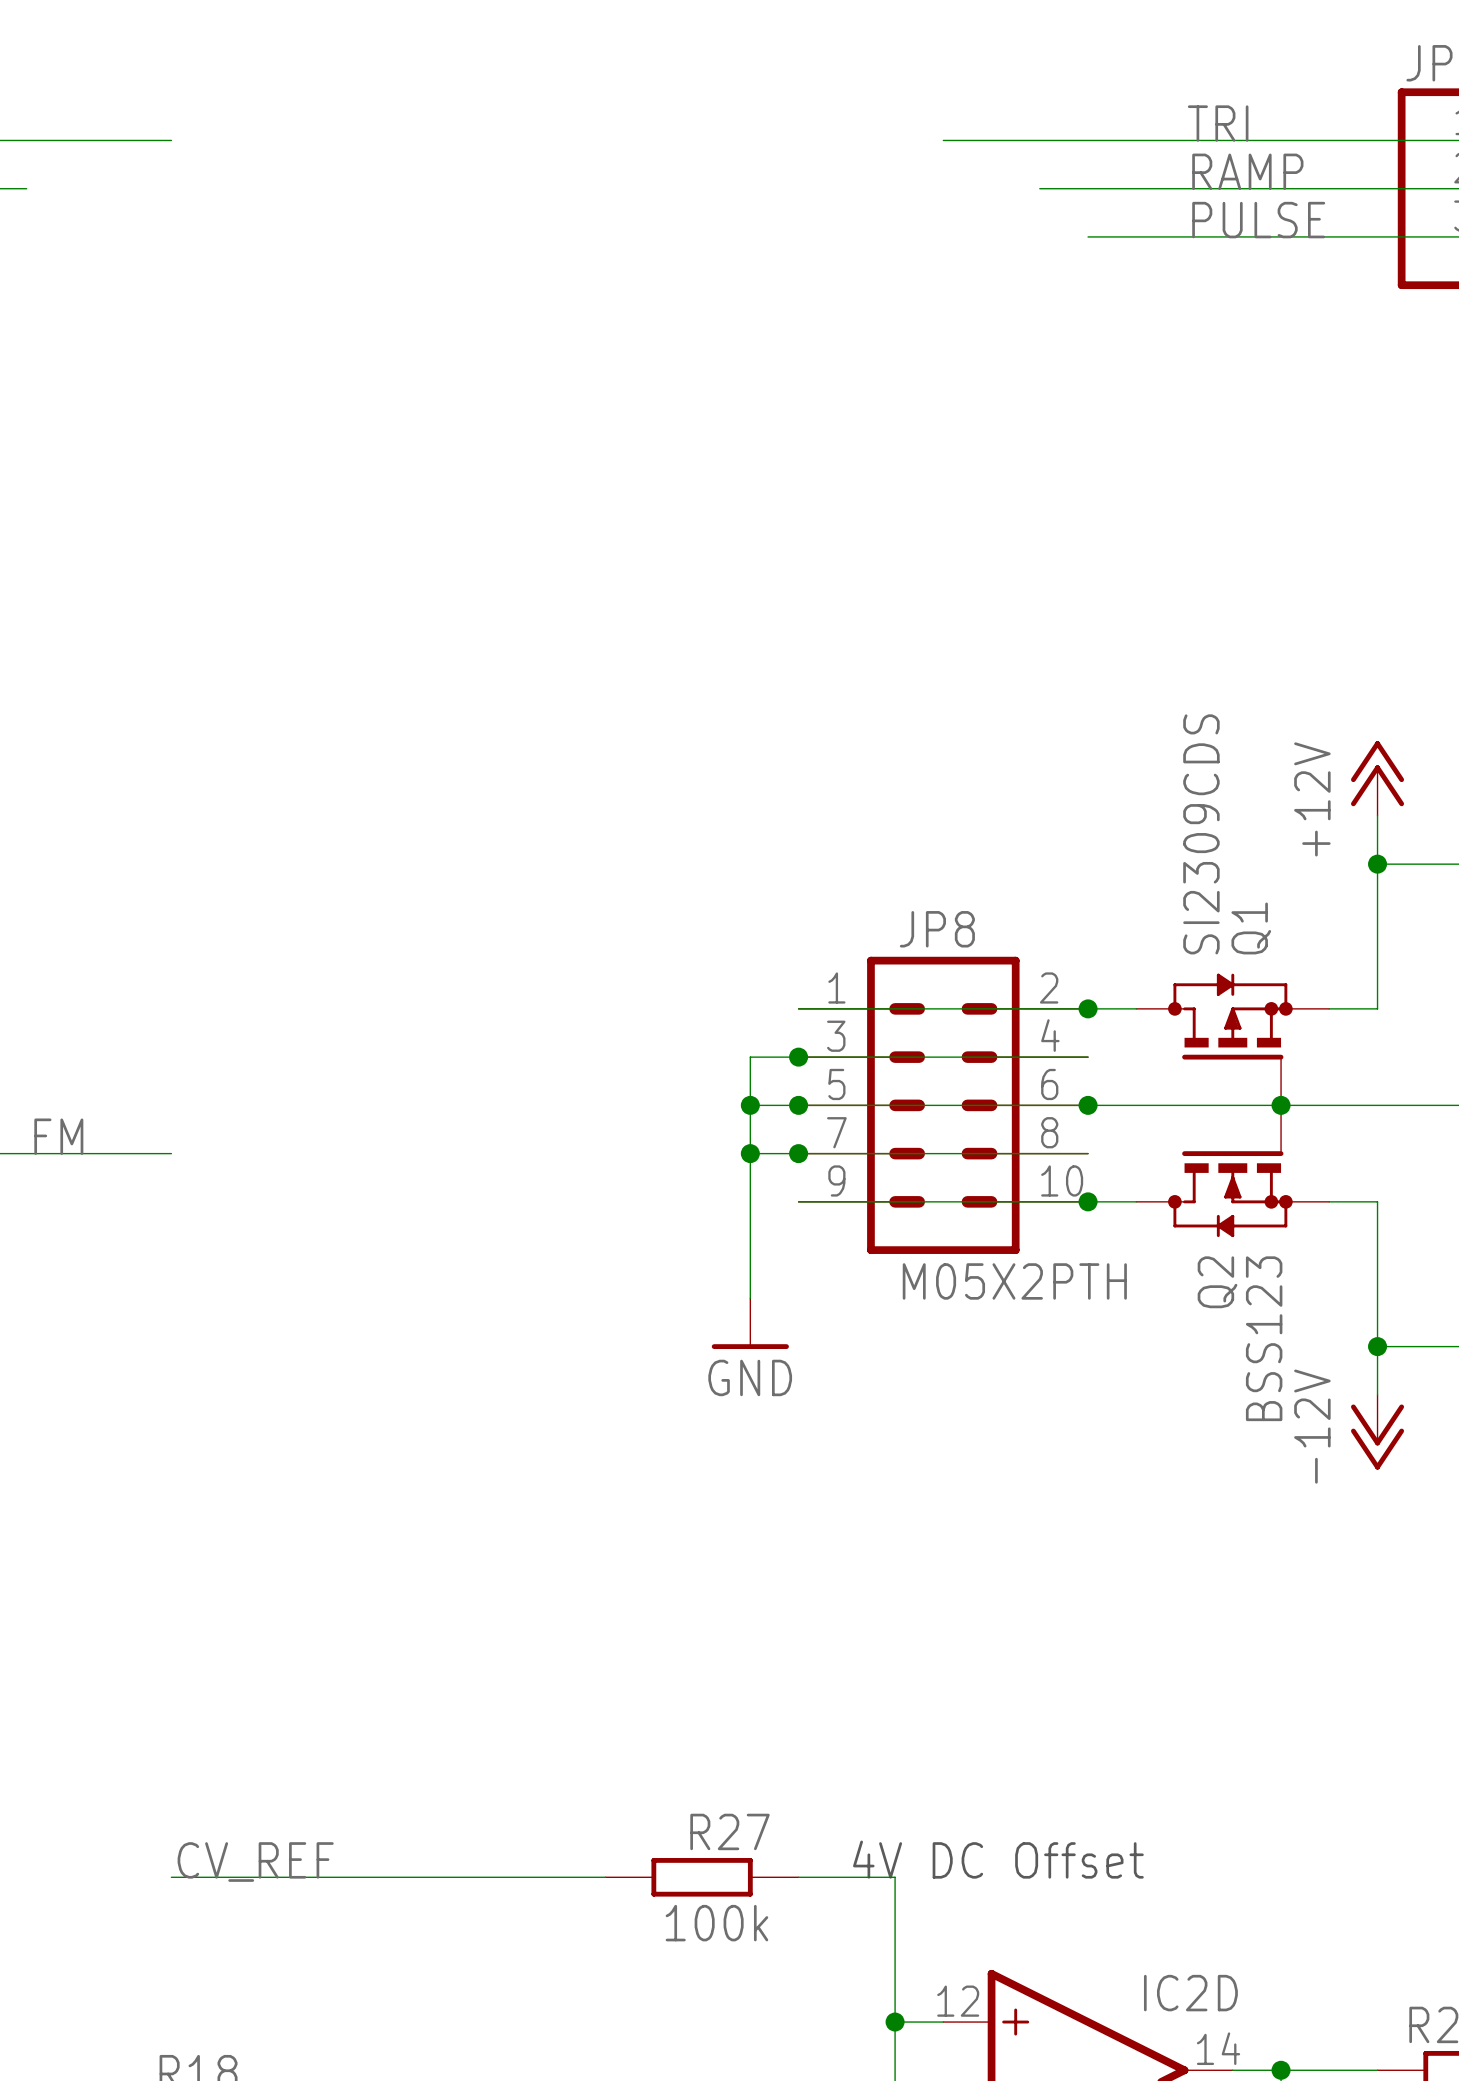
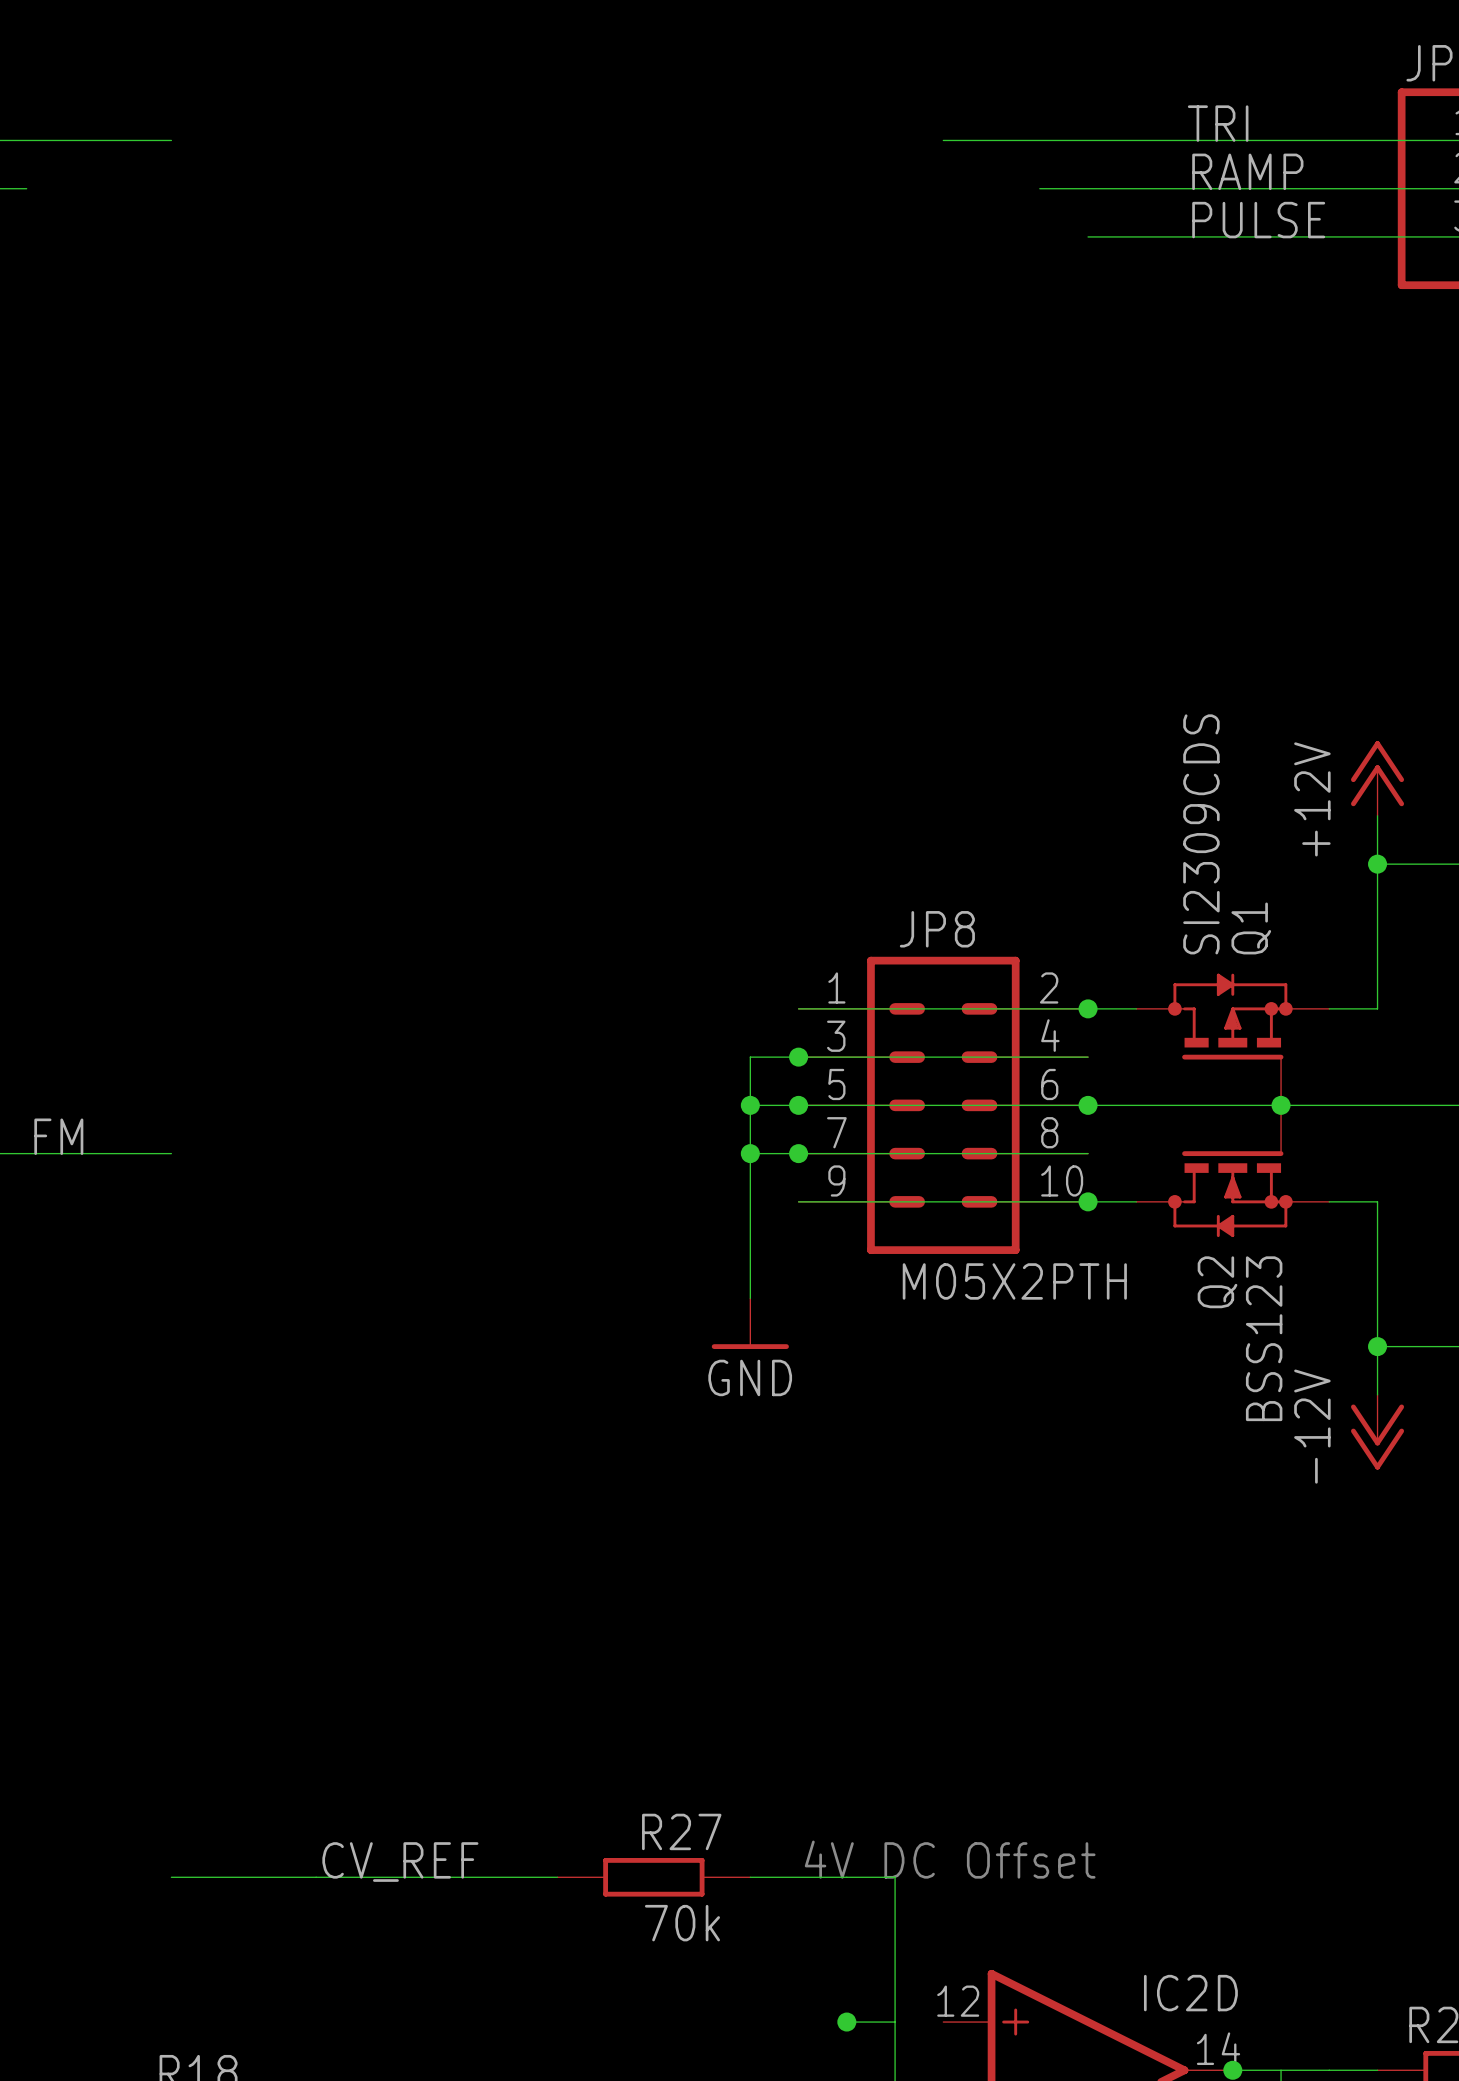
text position: 4V DC Offset (998, 1859) -> 4V DC Offset (950, 1859)
label position: CV_REF (255, 1862) -> CV_REF (400, 1862)
R27 position: (702, 1877) -> (653, 1877)
R27 value: 100k (716, 1923) -> 70k (682, 1923)
wire: (895, 2022) (943, 2022) -> (895, 2022) (846, 2022)
junction position: (895, 2022) -> (846, 2022)
junction position: (1281, 2070) -> (1232, 2070)

